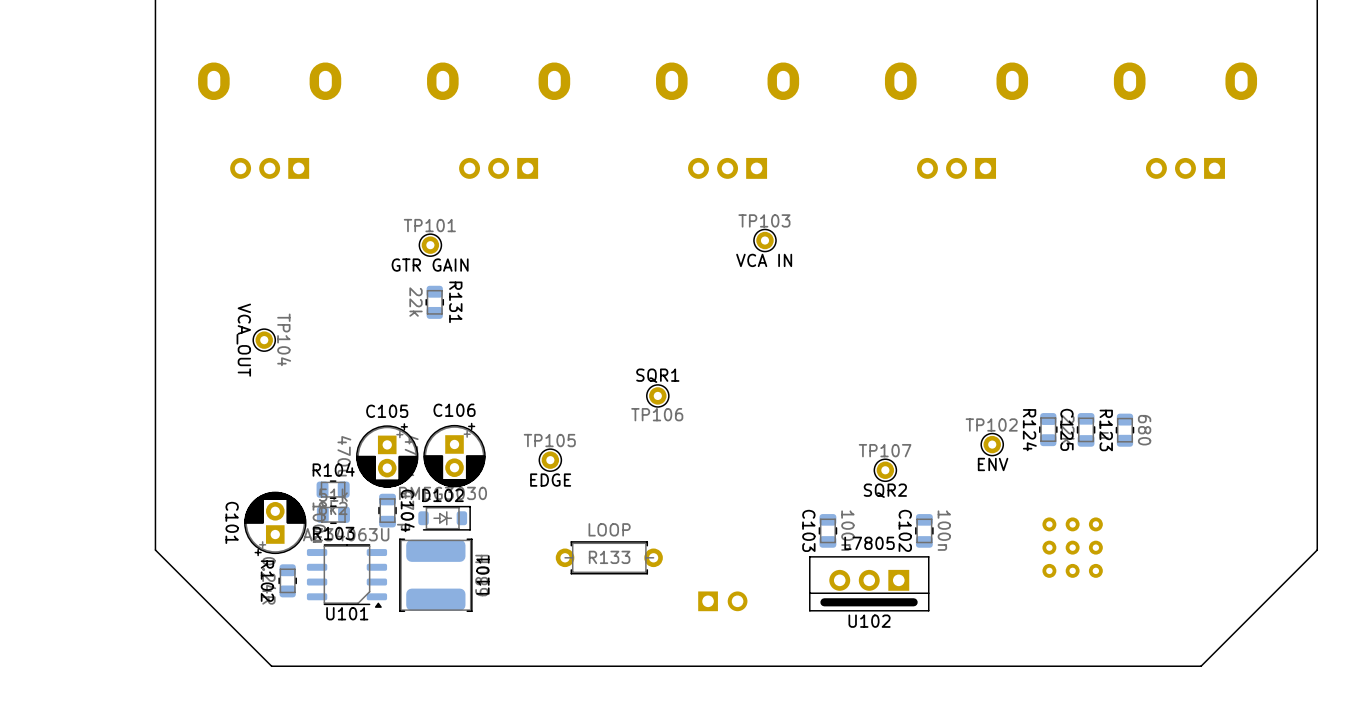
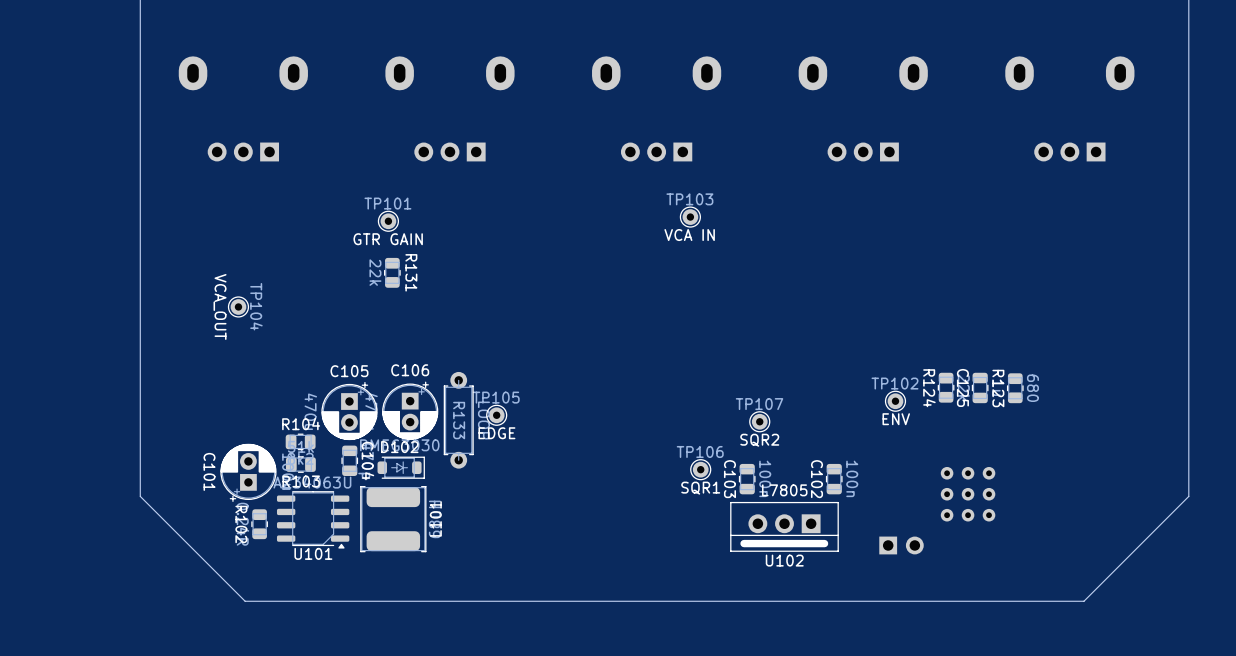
TP106 value position: SQR1 (657, 375) -> SQR1 (700, 488)
TP106 position: (657, 395) -> (700, 469)
TP106 name position: TP106 (657, 414) -> TP106 (700, 451)
TP107 position: (885, 470) -> (759, 421)
R133 rotation: 0° (609, 557) -> 90° clockwise (458, 420)
R133 position: (609, 557) -> (458, 420)
part position: (722, 601) -> (901, 545)

